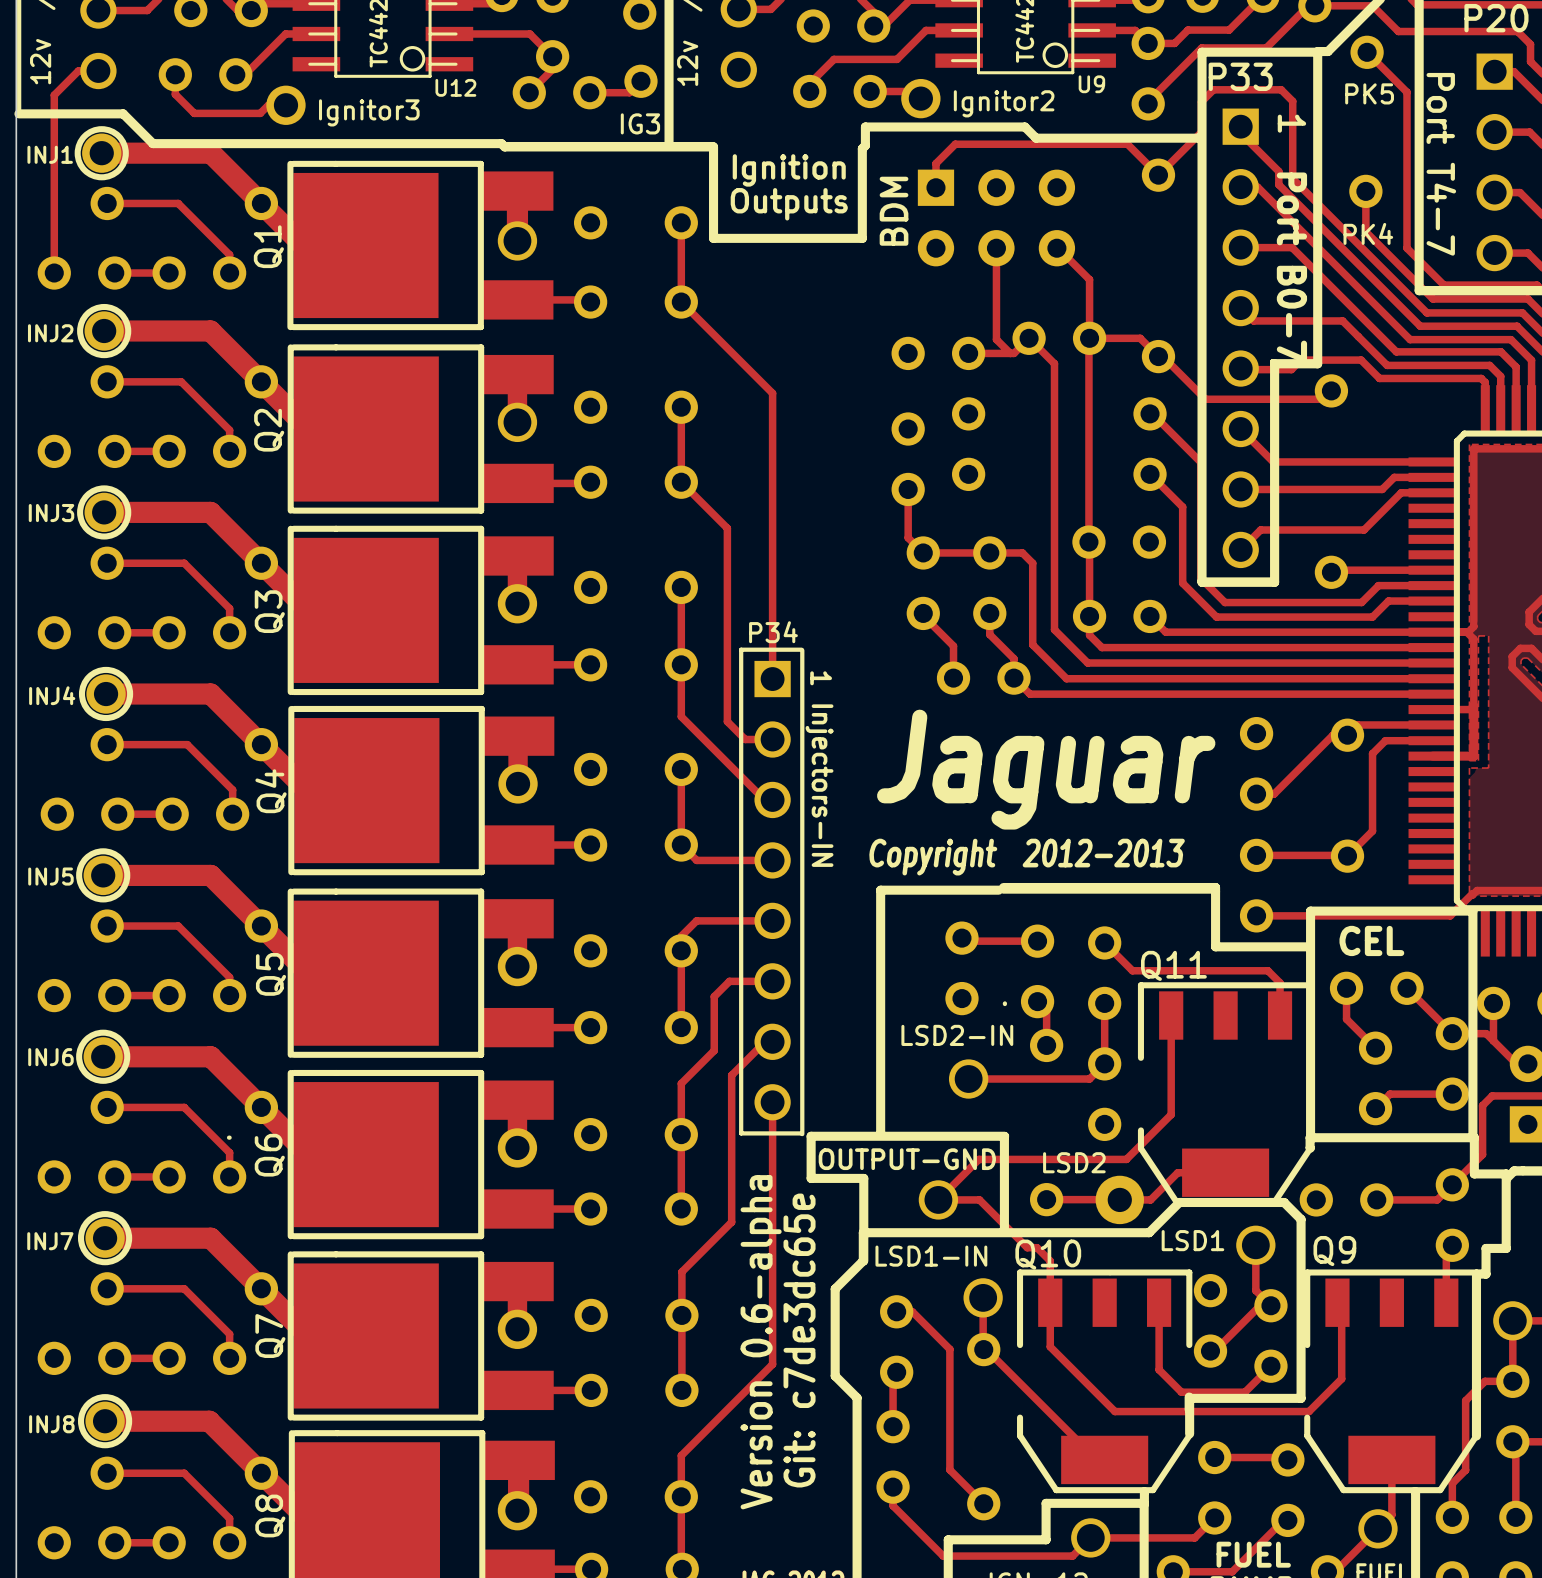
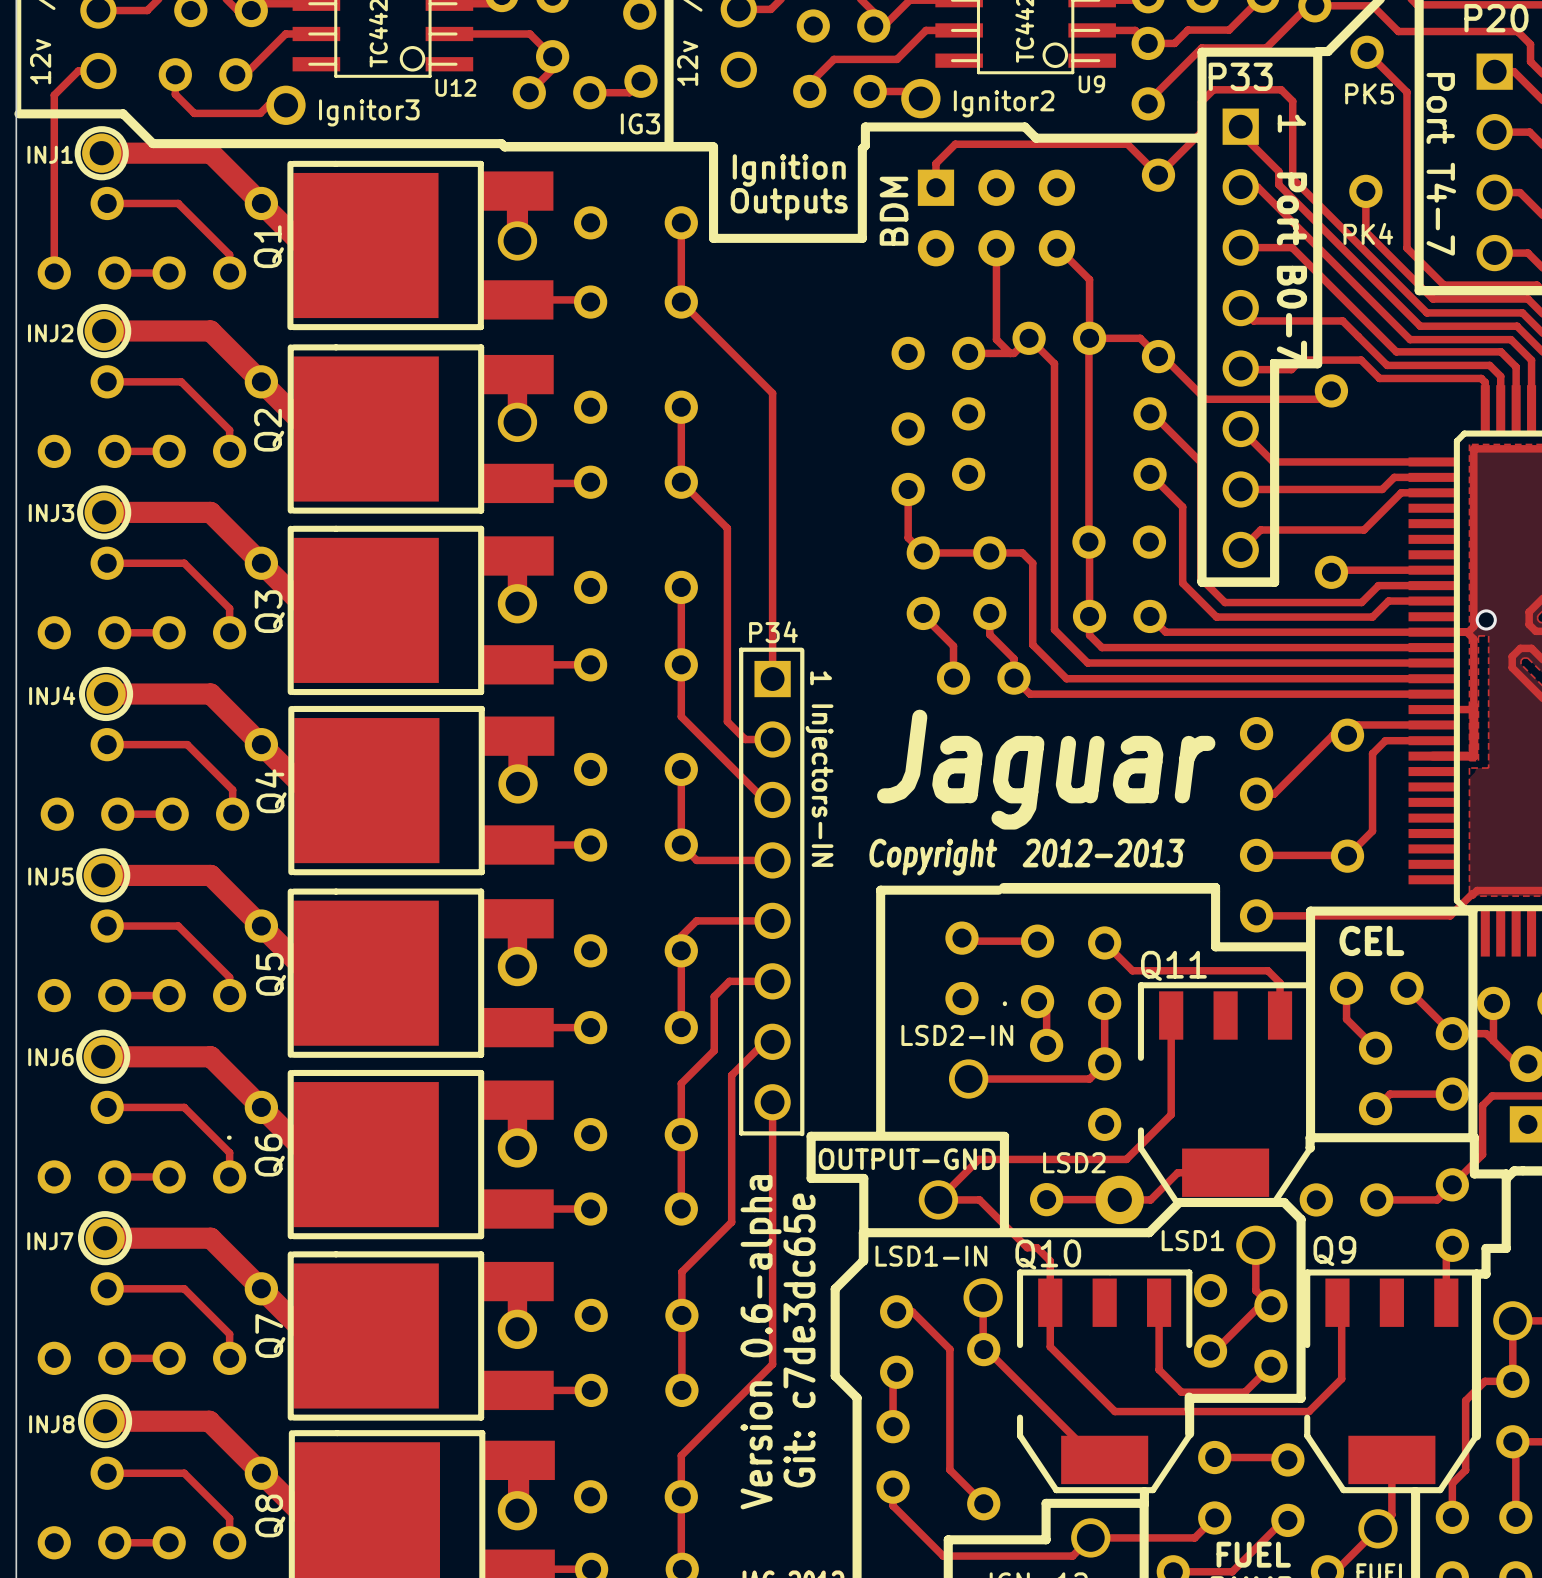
via: none -> (1486, 619)

